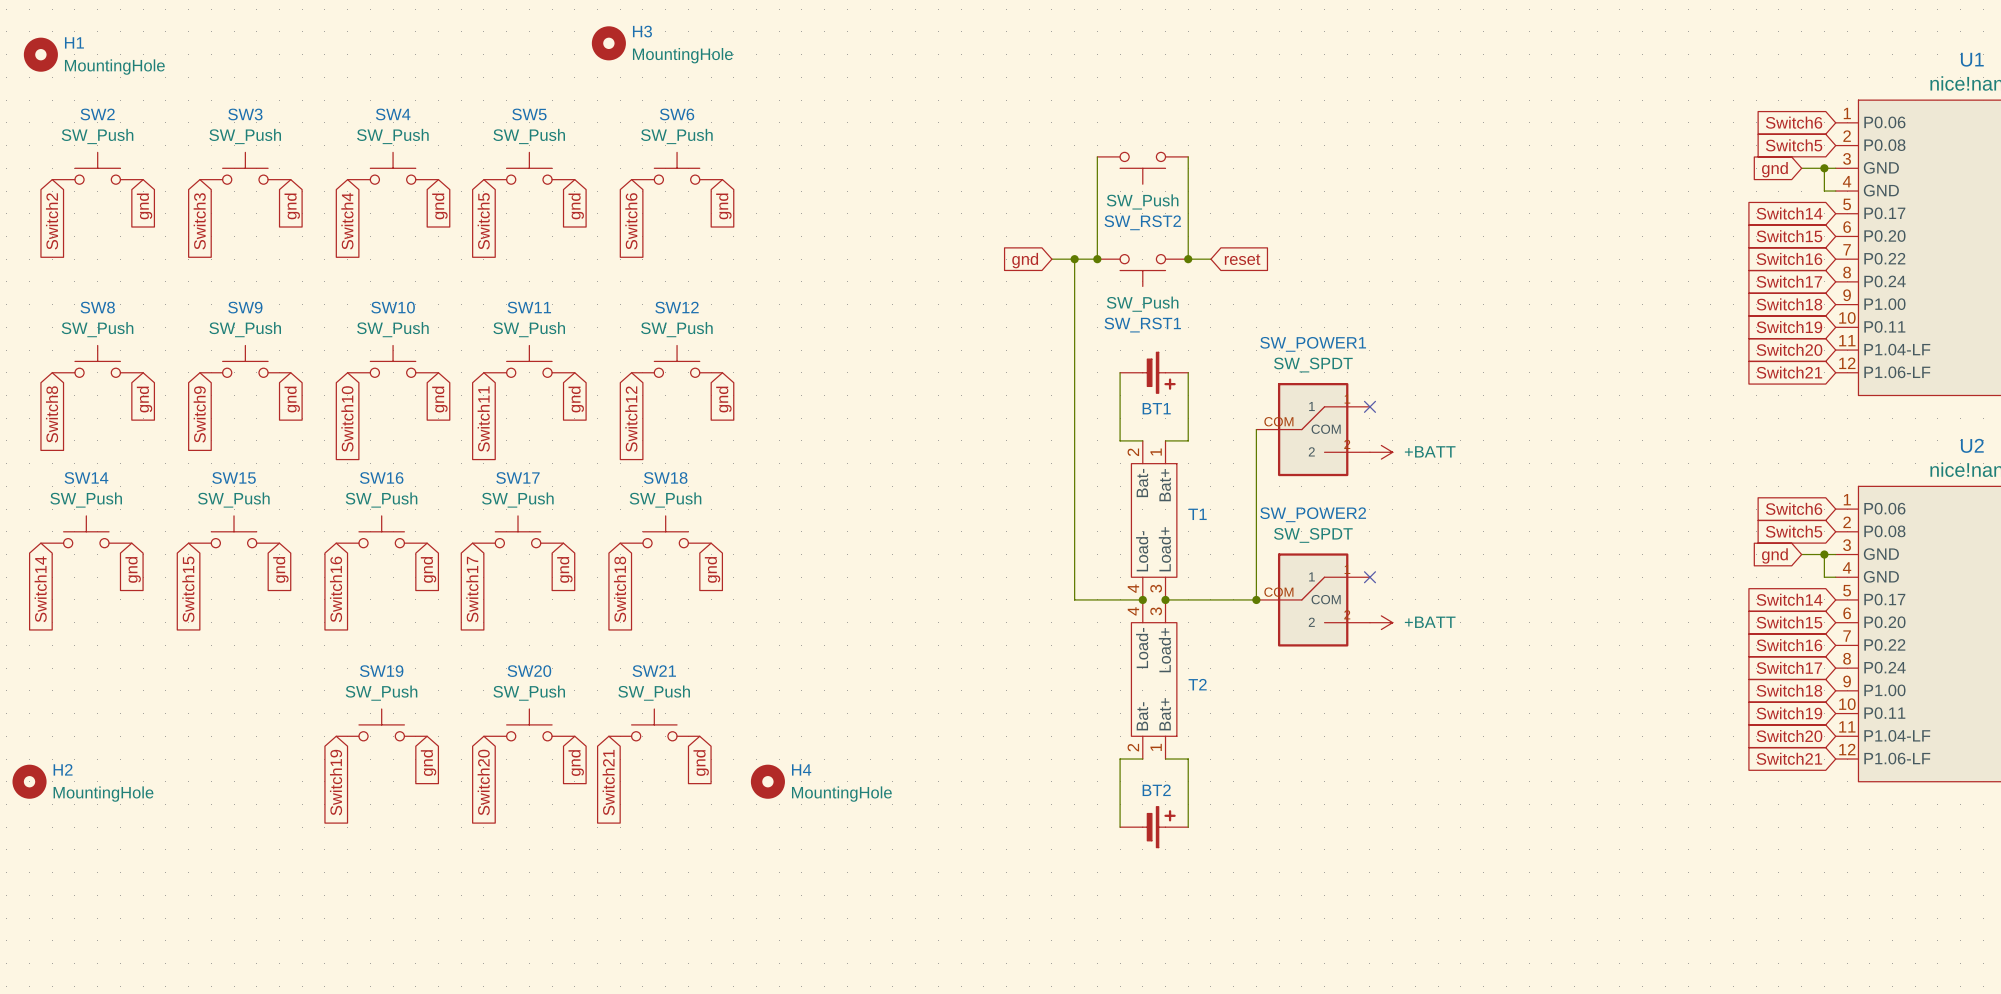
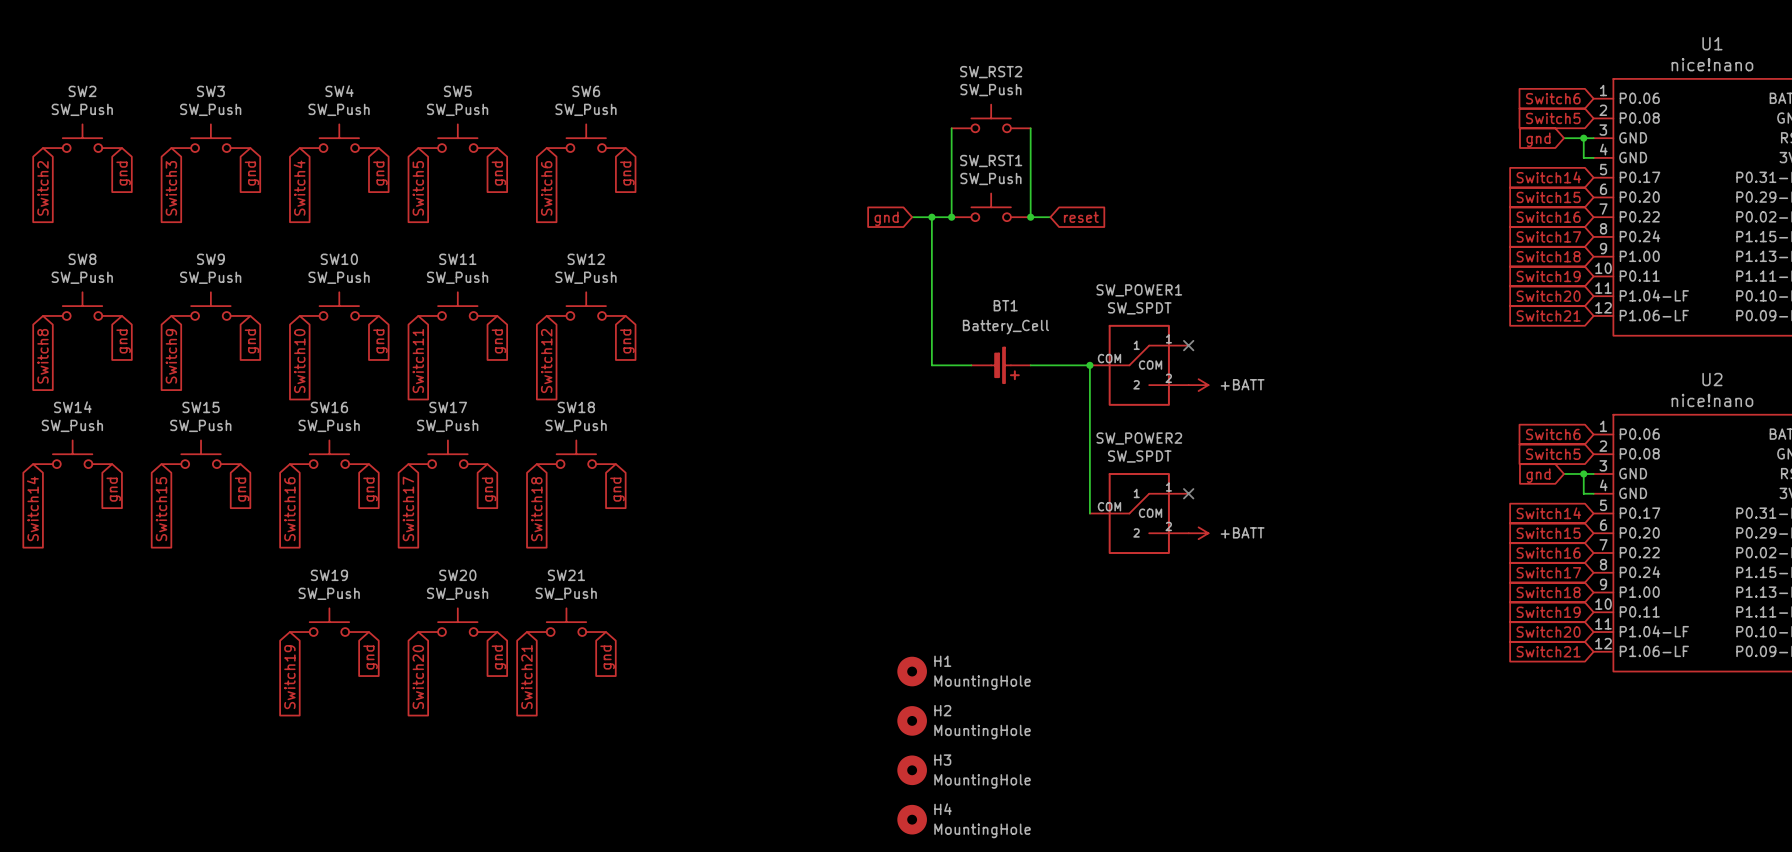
H3 position: (608, 43) -> (912, 770)
H1 position: (40, 54) -> (912, 671)
SW_RST2 rotation: 0° (1142, 168) -> 180° (991, 118)
SW_RST1 rotation: 0° (1142, 270) -> 180° (991, 207)
wire: (1120, 372) (1120, 440) (1142, 440) -> none
BT1 position: (1154, 372) -> (1001, 365)
wire: (1188, 372) (1188, 440) (1165, 440) -> none
BT1 value: none -> Battery_Cell (1005, 327)
BT1 name position: BT1 (1156, 408) -> BT1 (1005, 305)
wire: (1074, 429) (1074, 599) (1142, 599) -> (931, 365) (971, 365)
wire: none -> (1030, 365) (1089, 365)
junction: none -> (1089, 365)
T1: (1154, 520) -> none
junction: (1142, 599) -> none
wire: (1165, 599) (1256, 599) -> none
junction: (1165, 599) -> none
junction: (1256, 599) -> none
T2: (1154, 679) -> none
wire: (1142, 759) (1120, 759) (1120, 827) -> none
wire: (1165, 759) (1188, 759) (1188, 827) -> none
H2 position: (29, 781) -> (912, 720)
H4 position: (767, 781) -> (912, 819)
BT2: (1154, 827) -> none

